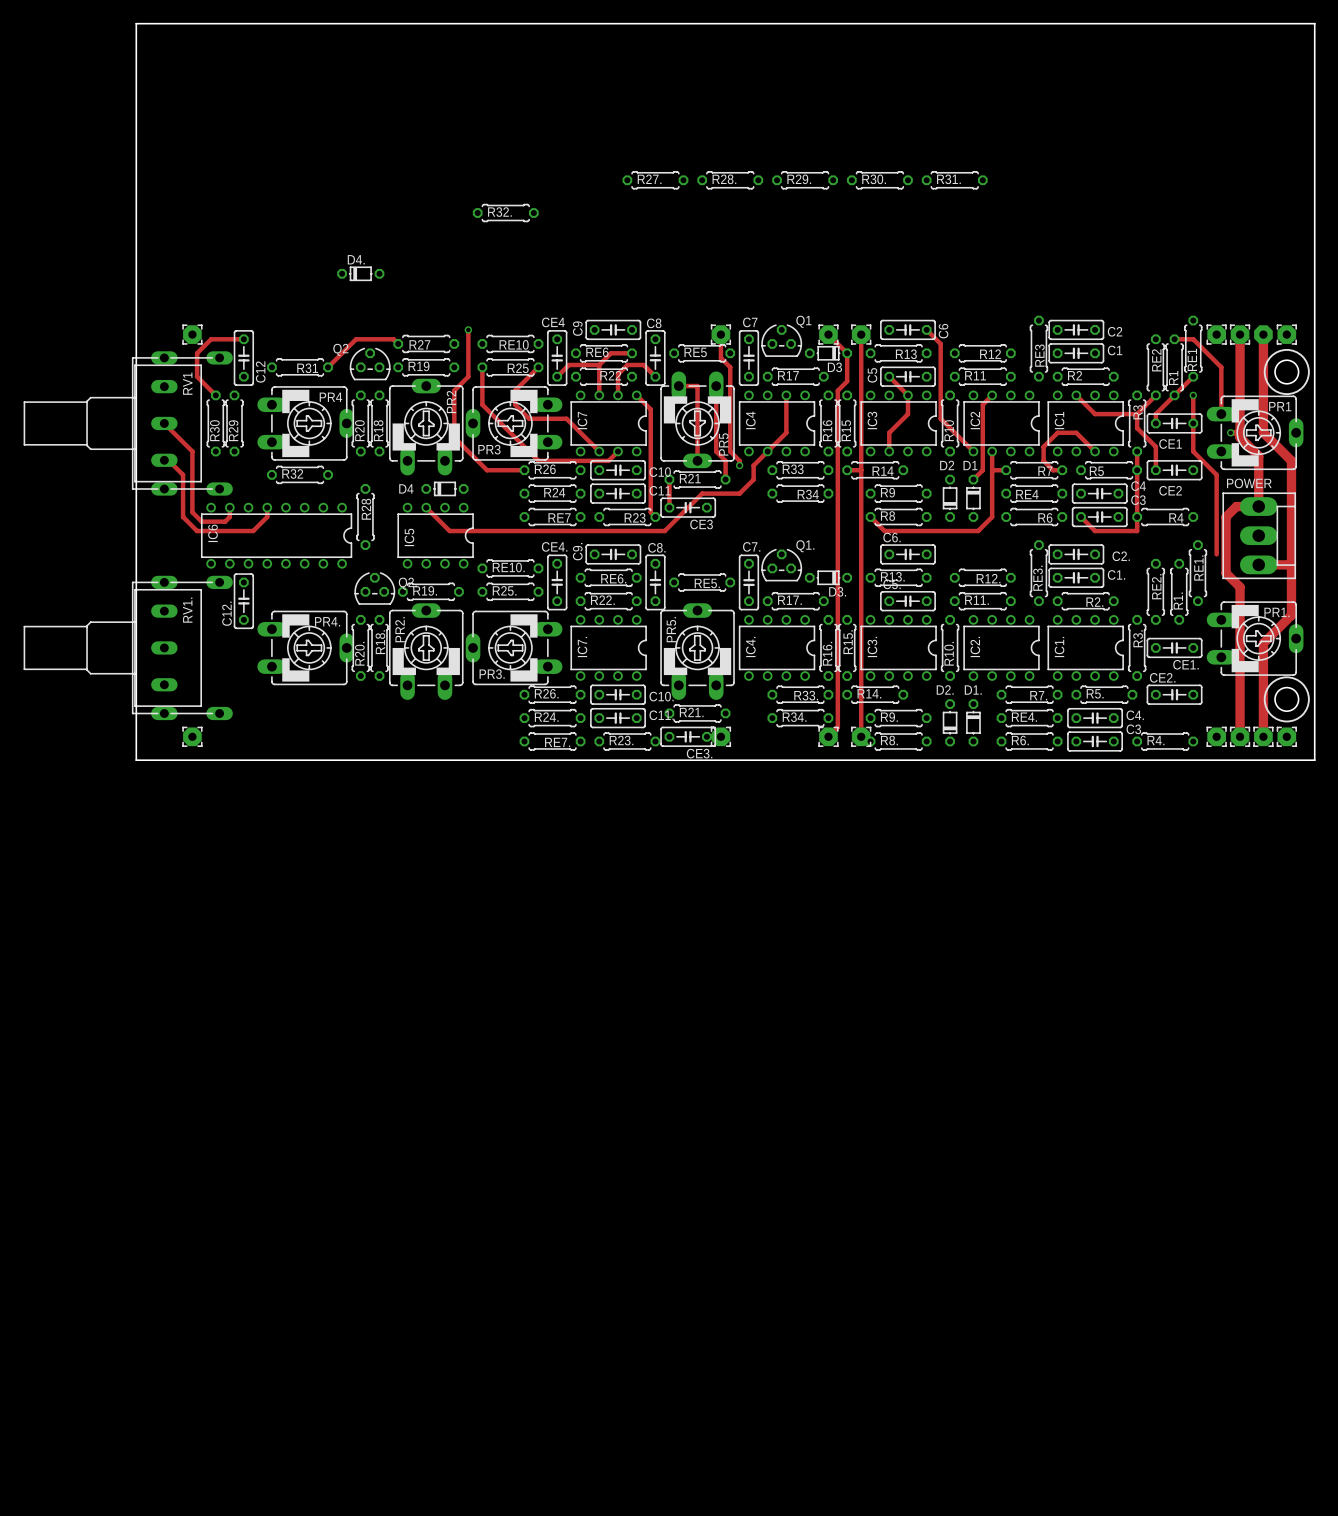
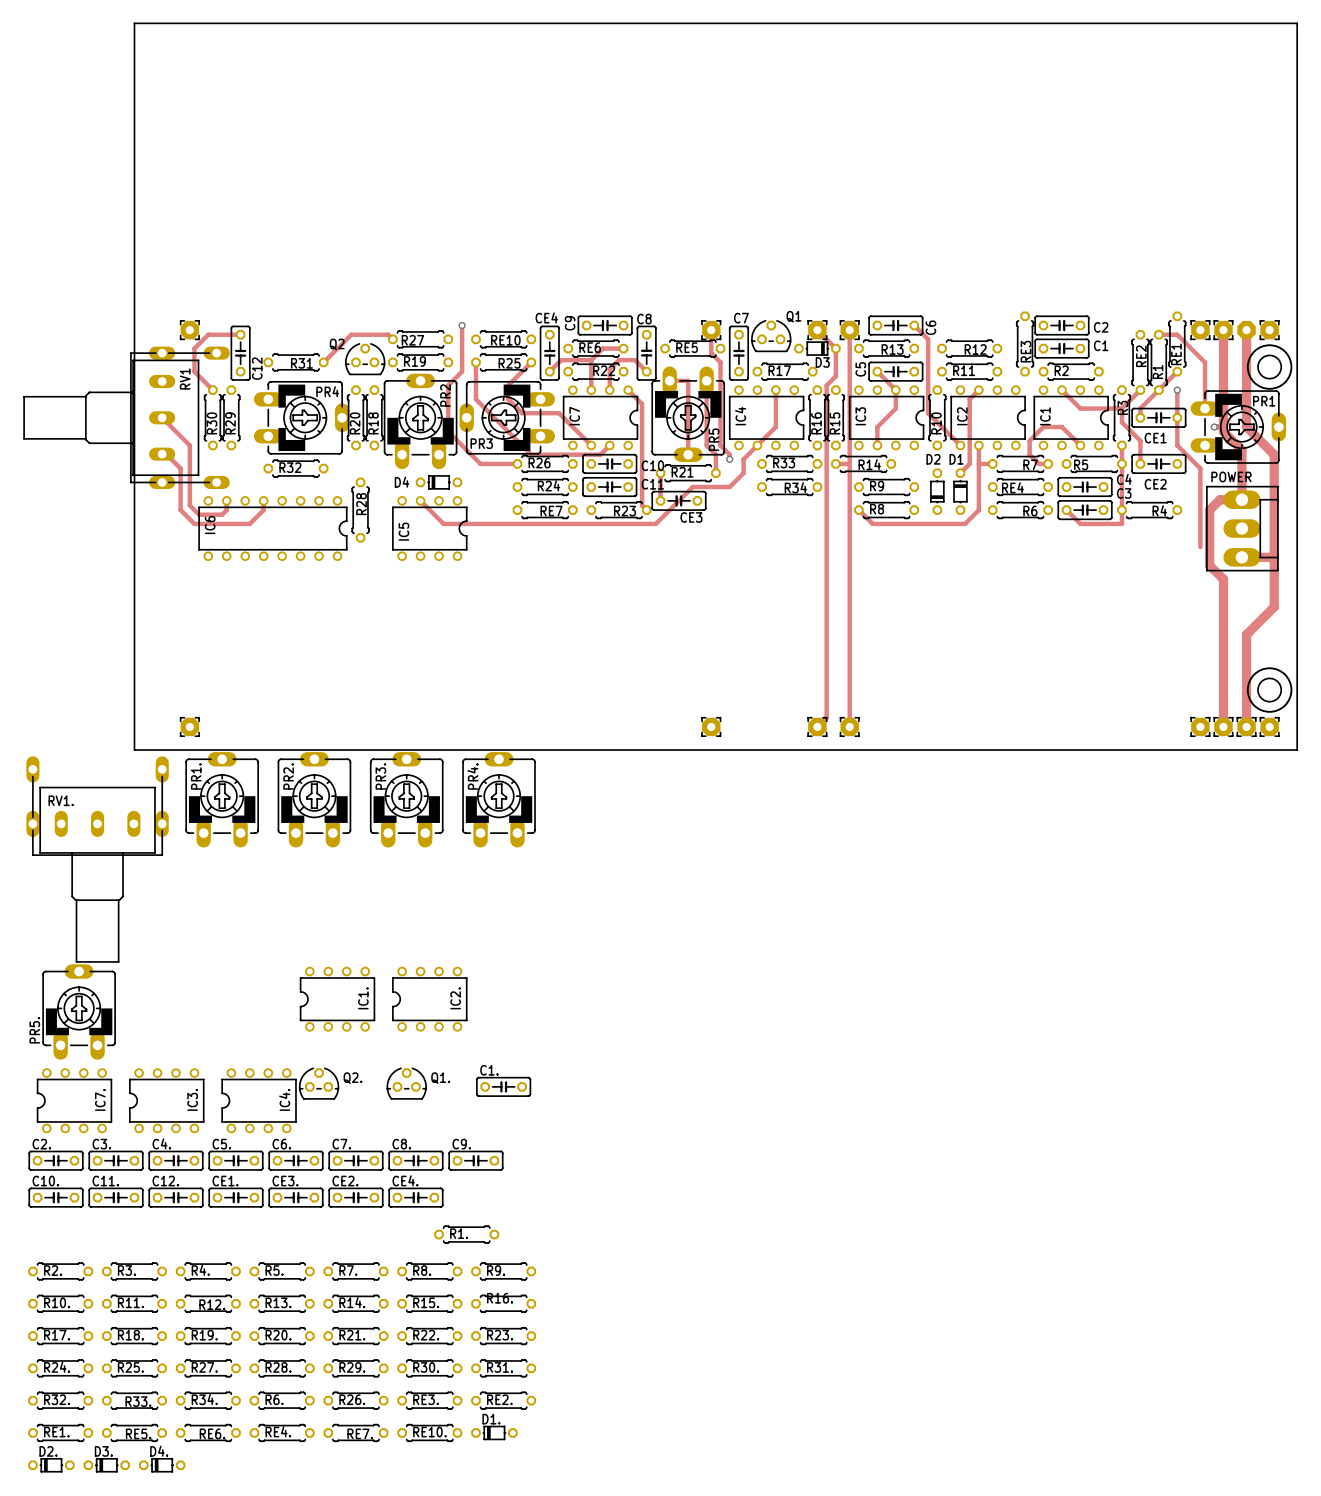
R27. position: (655, 180) -> (208, 1368)
R28. position: (730, 180) -> (282, 1368)
R29. position: (805, 180) -> (355, 1368)
R30. position: (879, 180) -> (429, 1368)
R31. position: (954, 180) -> (503, 1368)
R32. position: (505, 212) -> (60, 1400)
D4. position: (360, 273) -> (162, 1465)
CE4. name position: CE4. (554, 546) -> CE4. (405, 1180)
C7. name position: C7. (751, 546) -> C7. (341, 1144)
Q1. name position: Q1. (805, 546) -> Q1. (440, 1078)
C8. name position: C8. (656, 547) -> C8. (401, 1144)
Q1. footprint: [761, 549, 802, 582] -> [386, 1067, 427, 1100]
C9. name rotation: 0° (577, 551) -> 90° clockwise (461, 1144)
C9. position: (613, 554) -> (475, 1160)
C6. position: (907, 554) -> (295, 1160)
C2. rotation: 0° (1076, 554) -> 180° (56, 1160)
C2. position: (1076, 554) -> (56, 1160)
C2. name position: C2. (1121, 556) -> C2. (41, 1144)
RE10. position: (510, 568) -> (429, 1432)
RE3. rotation: 0° (1038, 573) -> 90° clockwise (429, 1400)
RE3. position: (1038, 573) -> (429, 1400)
RE1. rotation: 0° (1197, 573) -> 90° clockwise (60, 1432)
RE1. position: (1197, 573) -> (60, 1432)
C1. name position: C1. (1116, 574) -> C1. (489, 1070)
RE6. position: (608, 577) -> (208, 1432)
D3. rotation: 0° (828, 577) -> 180° (106, 1465)
D3. position: (828, 577) -> (106, 1465)
R13. position: (898, 577) -> (282, 1303)
R12. position: (982, 577) -> (208, 1303)
C1. rotation: 0° (1076, 577) -> 180° (503, 1086)
C1. position: (1076, 577) -> (503, 1086)
CE4. rotation: 0° (557, 582) -> 90° clockwise (415, 1197)
CE4. position: (557, 582) -> (415, 1197)
C8. rotation: 0° (655, 582) -> 90° clockwise (415, 1160)
C8. position: (655, 582) -> (415, 1160)
RE5. position: (702, 582) -> (134, 1432)
C7. rotation: 0° (748, 582) -> 90° counterclockwise (355, 1160)
C7. position: (748, 582) -> (355, 1160)
Q2. position: (374, 588) -> (319, 1083)
R19. position: (430, 591) -> (208, 1336)
R25. position: (510, 591) -> (134, 1368)
RE2. rotation: 0° (1155, 591) -> 90° clockwise (503, 1400)
RE2. position: (1155, 591) -> (503, 1400)
R1. rotation: 0° (1179, 591) -> 90° clockwise (466, 1234)
R1. position: (1179, 591) -> (466, 1234)
C12. rotation: 0° (243, 601) -> 90° clockwise (176, 1197)
C12. position: (243, 601) -> (176, 1197)
R22. position: (608, 601) -> (429, 1336)
R17. position: (795, 601) -> (60, 1336)
C5. position: (907, 601) -> (235, 1160)
R11. position: (982, 601) -> (134, 1303)
R2. position: (1085, 601) -> (60, 1271)
R2. name position: R2. (1094, 602) -> R2. (53, 1270)
PR5. name position: PR5. (671, 629) -> PR5. (34, 1030)
PR1. rotation: 0° (1255, 638) -> 90° counterclockwise (222, 799)
PR1. position: (1255, 638) -> (222, 799)
RV1. rotation: 0° (128, 647) -> 90° counterclockwise (97, 859)
RV1. position: (128, 647) -> (97, 859)
PR4. rotation: 0° (305, 647) -> 90° counterclockwise (499, 799)
PR4. position: (305, 647) -> (499, 799)
R20. rotation: 0° (360, 647) -> 90° clockwise (282, 1336)
R20. position: (360, 647) -> (282, 1336)
R18. rotation: 0° (379, 647) -> 90° clockwise (134, 1336)
R18. position: (379, 647) -> (134, 1336)
PR3. rotation: 0° (514, 647) -> 90° clockwise (406, 799)
PR3. position: (514, 647) -> (406, 799)
IC7. rotation: 0° (608, 647) -> 180° (74, 1100)
IC7. position: (608, 647) -> (74, 1100)
IC4. rotation: 0° (777, 647) -> 180° (259, 1100)
IC4. position: (777, 647) -> (259, 1100)
R16. rotation: 0° (828, 647) -> 90° clockwise (503, 1303)
R16. position: (828, 647) -> (503, 1303)
R15. rotation: 0° (847, 647) -> 90° clockwise (429, 1303)
R15. position: (847, 647) -> (429, 1303)
IC3. rotation: 0° (898, 647) -> 180° (166, 1100)
IC3. position: (898, 647) -> (166, 1100)
R10. rotation: 0° (950, 647) -> 90° clockwise (60, 1303)
R10. position: (950, 647) -> (60, 1303)
IC2. rotation: 0° (1001, 647) -> 180° (429, 999)
IC2. position: (1001, 647) -> (429, 999)
IC1. rotation: 0° (1085, 647) -> 180° (337, 999)
IC1. position: (1085, 647) -> (337, 999)
R3. rotation: 0° (1137, 647) -> 90° clockwise (134, 1271)
R3. position: (1137, 647) -> (134, 1271)
CE1. rotation: 0° (1174, 647) -> 180° (235, 1197)
CE1. position: (1174, 647) -> (235, 1197)
PR2. position: (426, 651) -> (314, 799)
PR5. position: (697, 651) -> (79, 1012)
D2. name position: D2. (945, 689) -> D2. (48, 1451)
D1. name position: D1. (973, 690) -> D1. (491, 1419)
R26. position: (552, 694) -> (355, 1400)
C10. position: (618, 694) -> (56, 1197)
R33. position: (800, 694) -> (134, 1400)
R14. position: (875, 694) -> (355, 1303)
R7. position: (1029, 694) -> (355, 1271)
R5. position: (1104, 694) -> (282, 1271)
CE2. position: (1174, 694) -> (355, 1197)
R7. name position: R7. (1038, 695) -> R7. (348, 1270)
C10. name position: C10. (661, 696) -> C10. (45, 1181)
R21. position: (697, 713) -> (355, 1336)
C11. name position: C11. (661, 715) -> C11. (105, 1181)
C4. name position: C4. (1135, 715) -> C4. (161, 1143)
R24. position: (552, 718) -> (60, 1368)
C11. position: (618, 718) -> (116, 1197)
R34. position: (800, 718) -> (208, 1400)
R9. position: (898, 718) -> (503, 1271)
RE4. position: (1029, 718) -> (282, 1432)
C4. position: (1095, 718) -> (176, 1160)
D2. rotation: 0° (950, 722) -> 90° clockwise (51, 1465)
D2. position: (950, 722) -> (51, 1465)
D1. rotation: 0° (973, 722) -> 90° counterclockwise (494, 1432)
D1. position: (973, 722) -> (494, 1432)
C3. name position: C3. (1135, 729) -> C3. (101, 1144)
CE3. rotation: 0° (688, 736) -> 180° (295, 1197)
CE3. position: (688, 736) -> (295, 1197)
RE7. position: (552, 741) -> (355, 1432)
R23. position: (627, 741) -> (503, 1336)
R8. position: (898, 741) -> (429, 1271)
R6. position: (1029, 741) -> (282, 1400)
C3. position: (1095, 741) -> (116, 1160)
R4. position: (1165, 741) -> (208, 1271)

